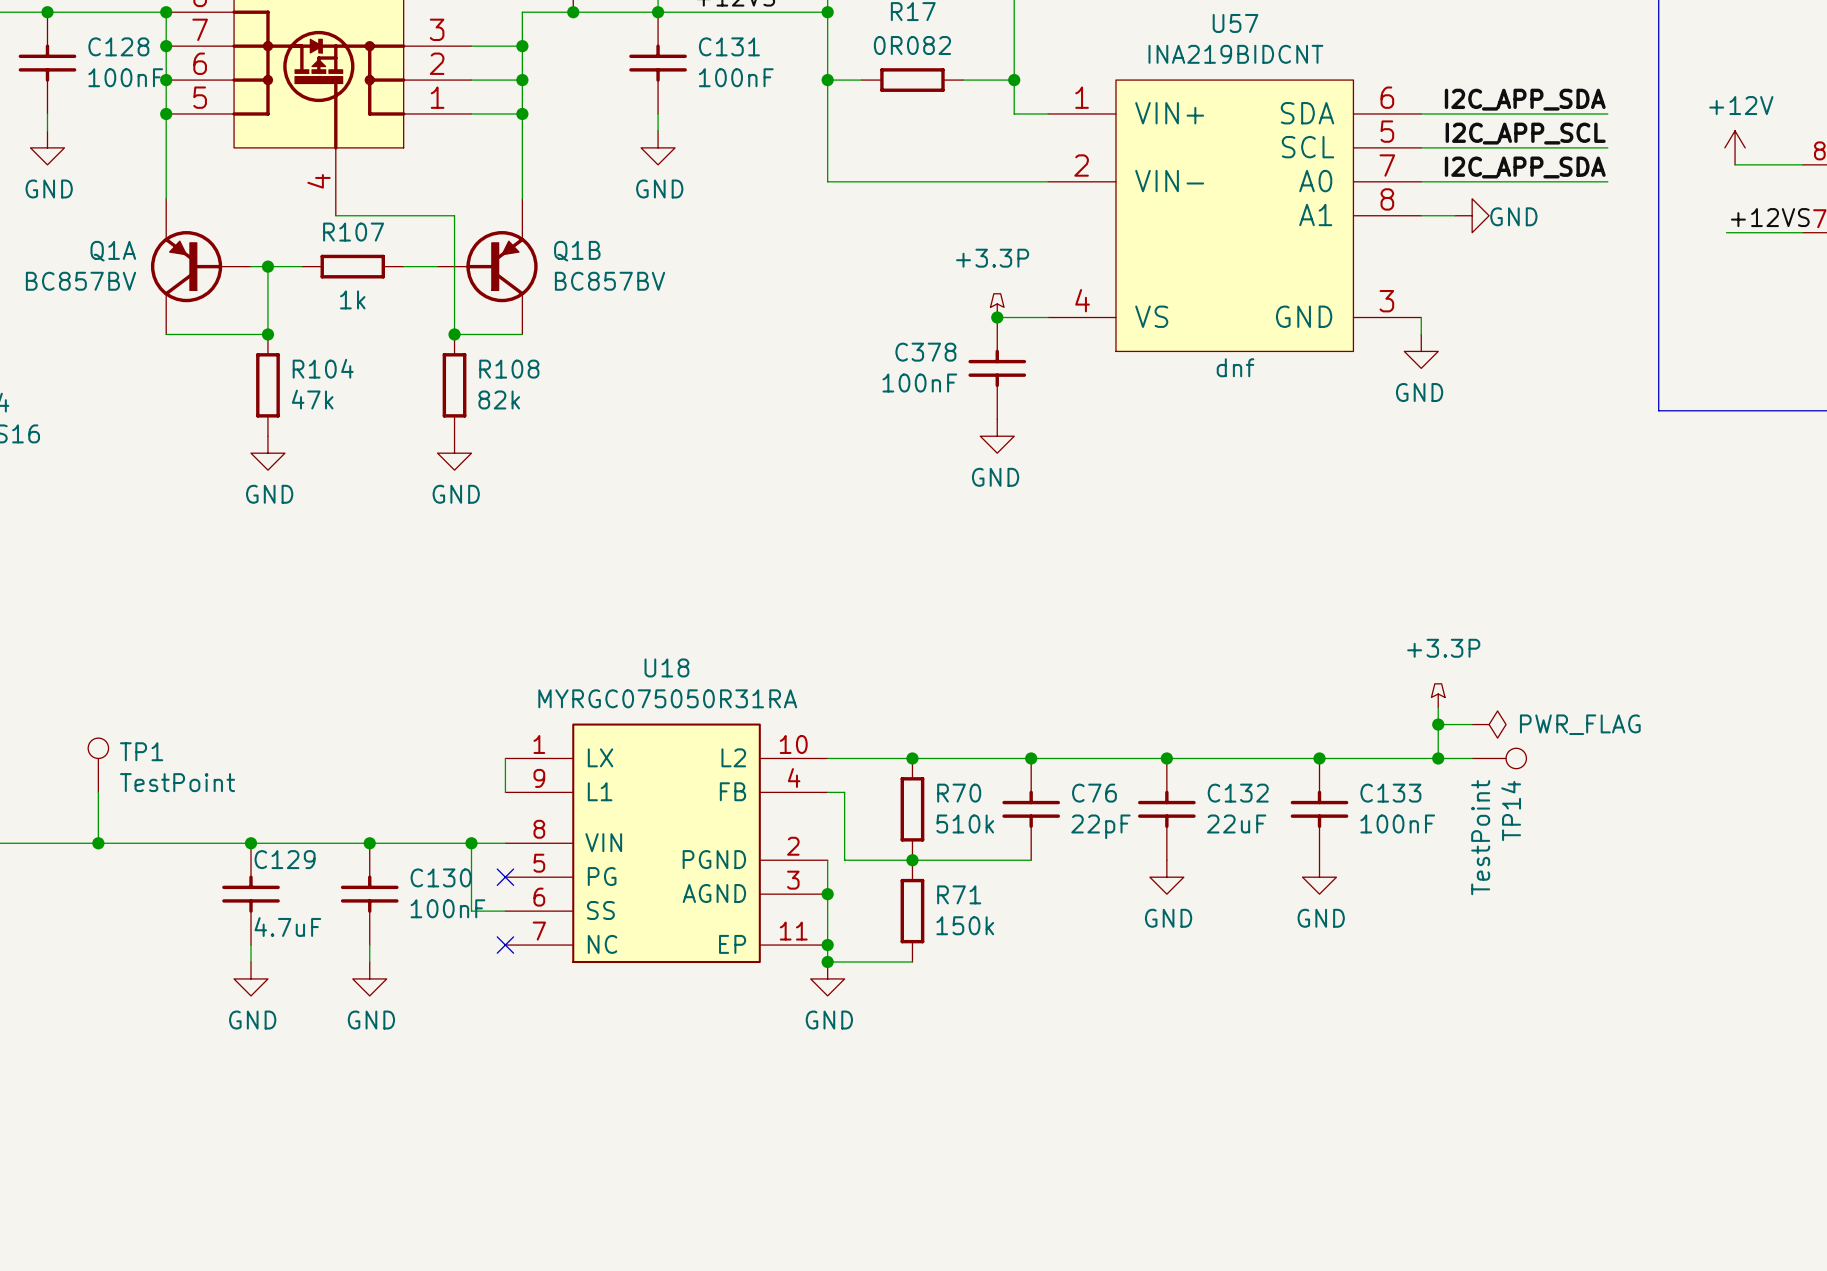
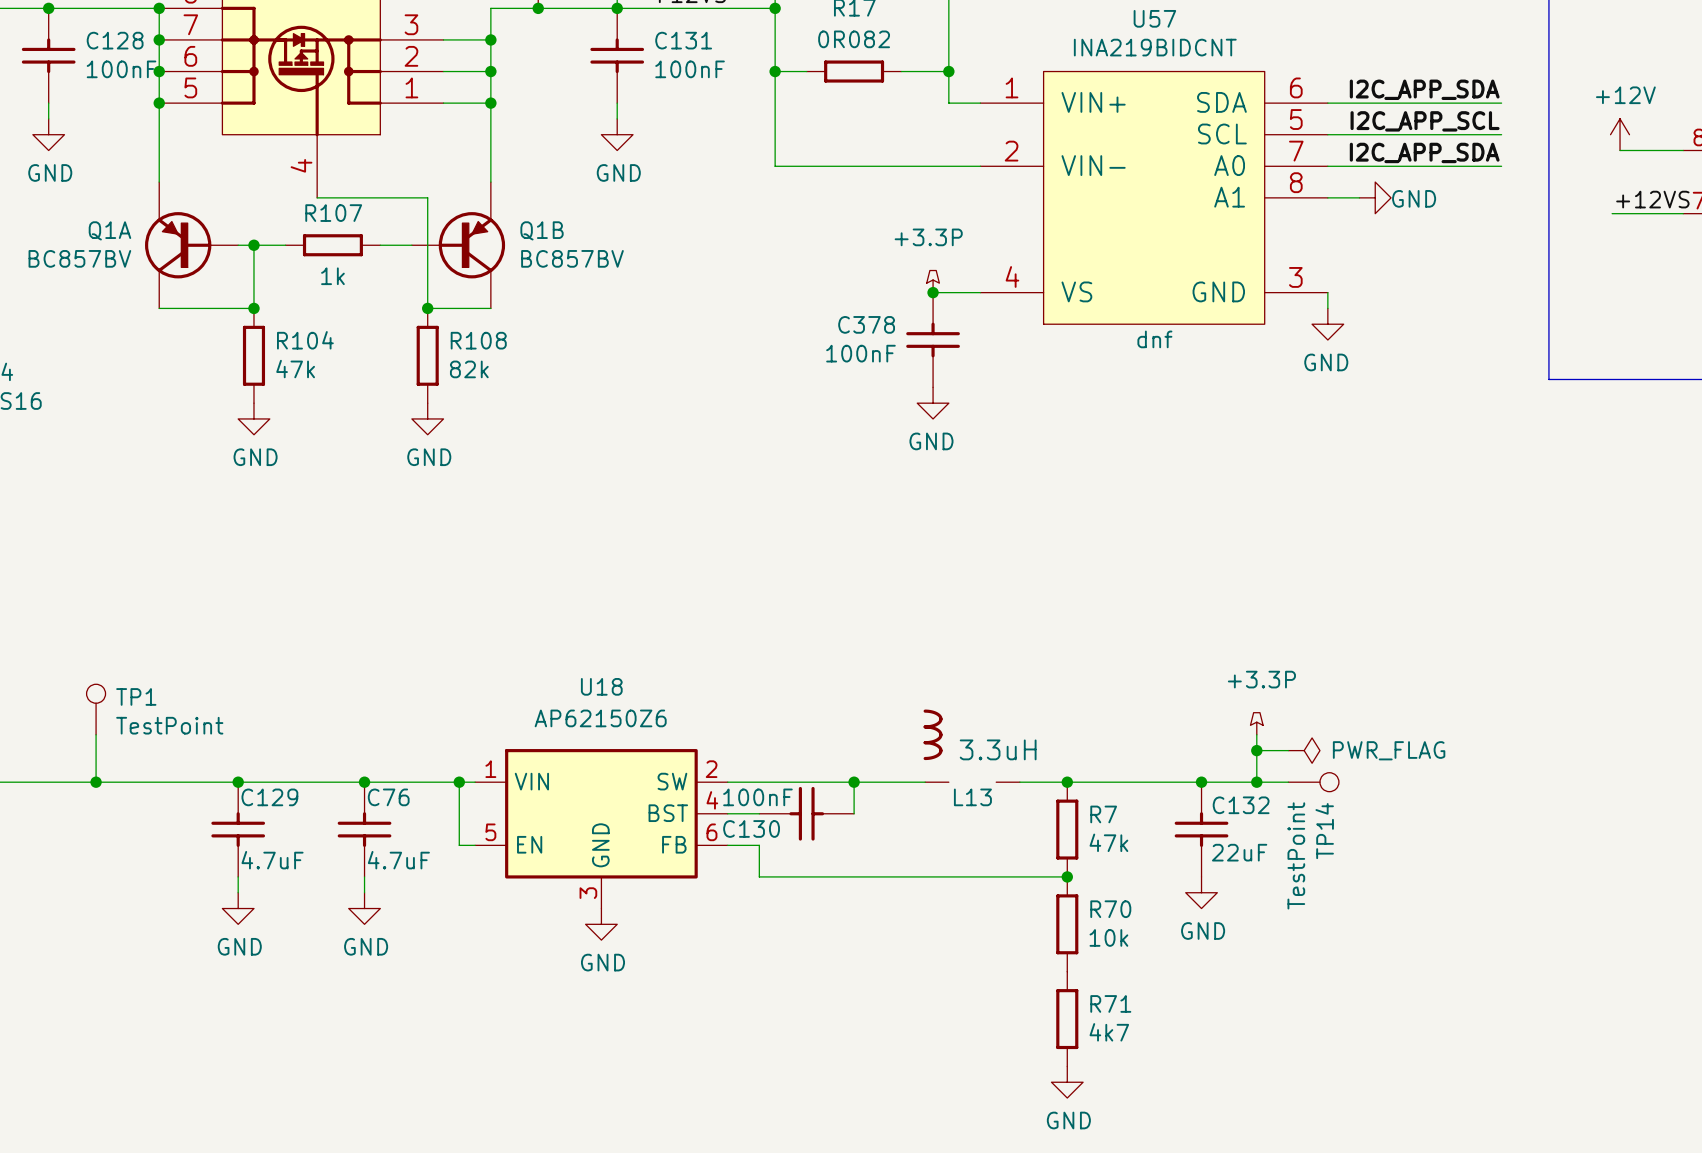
power symbol position: +3.3P (1438, 695) -> +3.3P (1256, 723)
U18 value: MYRGC075050R31RA (667, 698) -> AP62150Z6 (600, 718)
wire: (1438, 707) (1438, 758) -> (1256, 734) (1256, 782)
U18 symbol: [505, 723, 828, 964] -> [475, 749, 728, 909]
wire: (1438, 724) (1472, 724) -> (1256, 750) (1288, 750)
junction: (1438, 724) -> none
power symbol position: PWR_FLAG (1489, 724) -> PWR_FLAG (1304, 750)
wire: (505, 758) (505, 792) -> none
wire: (827, 758) (1472, 758) -> none
junction: (912, 758) -> none
junction: (1031, 758) -> none
junction: (1166, 758) -> none
junction: (1319, 758) -> none
junction: (1438, 758) -> none
TP14 position: (1499, 758) -> (1313, 782)
wire: (827, 792) (844, 792) (844, 860) (1031, 860) -> none
C76 name position: C76 (1094, 793) -> C76 (388, 797)
C132 name position: C132 (1238, 793) -> C132 (1241, 805)
L13: none -> (971, 745)
R70 position: (912, 809) -> (1067, 924)
C76 position: (1031, 809) -> (364, 829)
C132 position: (1166, 809) -> (1201, 829)
C133: (1319, 809) -> none
junction: none -> (1256, 750)
R70 text: 510k (965, 823) -> none
C132 text position: 22uF (1236, 823) -> 22uF (1239, 852)
C76 text: 22pF (1100, 826) -> none
junction position: (369, 843) -> (364, 782)
wire: (471, 843) (471, 911) (488, 911) -> (459, 782) (459, 845)
junction position: (471, 843) -> (459, 782)
wire: none -> (727, 782) (925, 782)
wire: none -> (1019, 782) (1288, 782)
junction: none -> (1067, 782)
junction: none -> (1201, 782)
junction: none -> (1256, 782)
wire: (827, 860) (827, 962) (912, 962) -> none
junction position: (912, 860) -> (854, 782)
C130 name position: C130 (441, 877) -> C130 (751, 828)
no-connect mark: (505, 877) -> none
wire: none -> (727, 813) (759, 813)
power symbol: GND (1166, 877) -> none
power symbol: GND (1319, 877) -> none
C130 rotation: 0° (369, 894) -> 90° clockwise (806, 813)
C130 position: (369, 894) -> (806, 813)
junction: (827, 894) -> none
R7: none -> (1067, 829)
C130 text position: 100nF (447, 908) -> 100nF (757, 797)
wire: none -> (727, 845) (759, 845) (759, 876) (1067, 876)
R71 position: (912, 911) -> (1067, 1019)
R71 text: 150k (965, 925) -> none
C76 text: none -> 4.7uF (398, 860)
wire: (369, 945) (369, 962) -> (364, 876) (364, 892)
no-connect mark: (505, 945) -> none
junction: (827, 945) -> none
junction: none -> (1067, 876)
junction: (827, 962) -> none
power symbol: none -> GND (1201, 892)
power symbol position: GND (369, 978) -> GND (364, 908)
power symbol: GND (827, 978) -> none
power symbol: none -> GND (601, 924)
R70 text: none -> 10k (1108, 937)
R71 text: none -> 4k7 (1109, 1032)
power symbol: none -> GND (1067, 1082)

